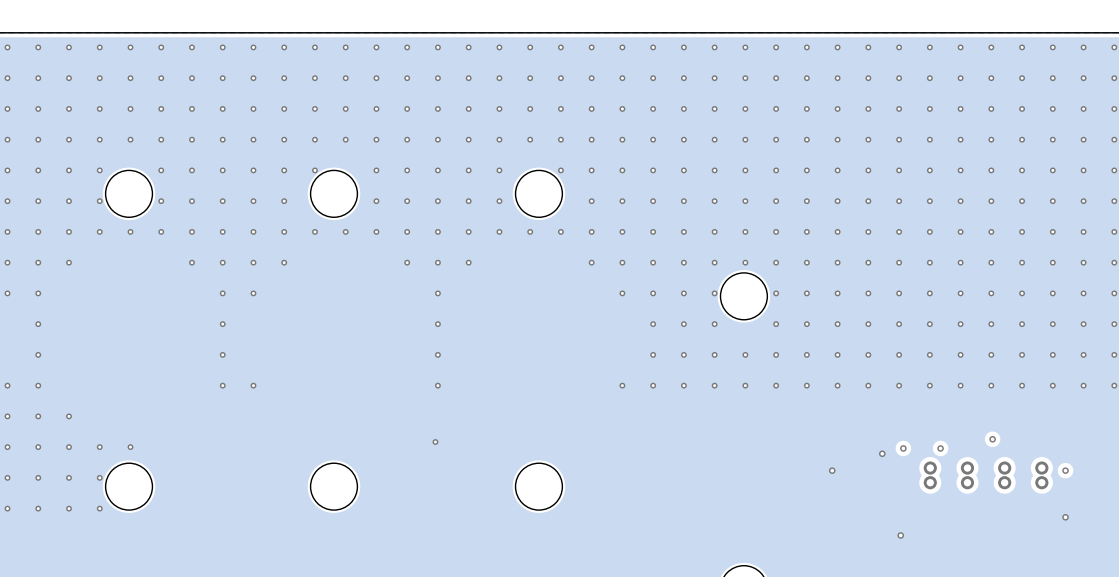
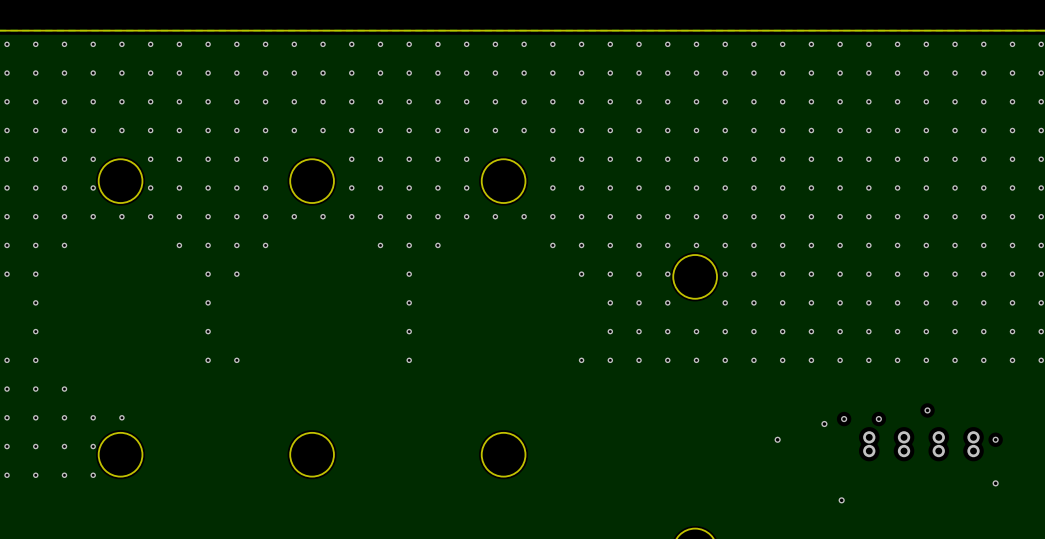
via: (314, 170) -> none
via: (560, 170) -> none
via: (435, 442) -> none

